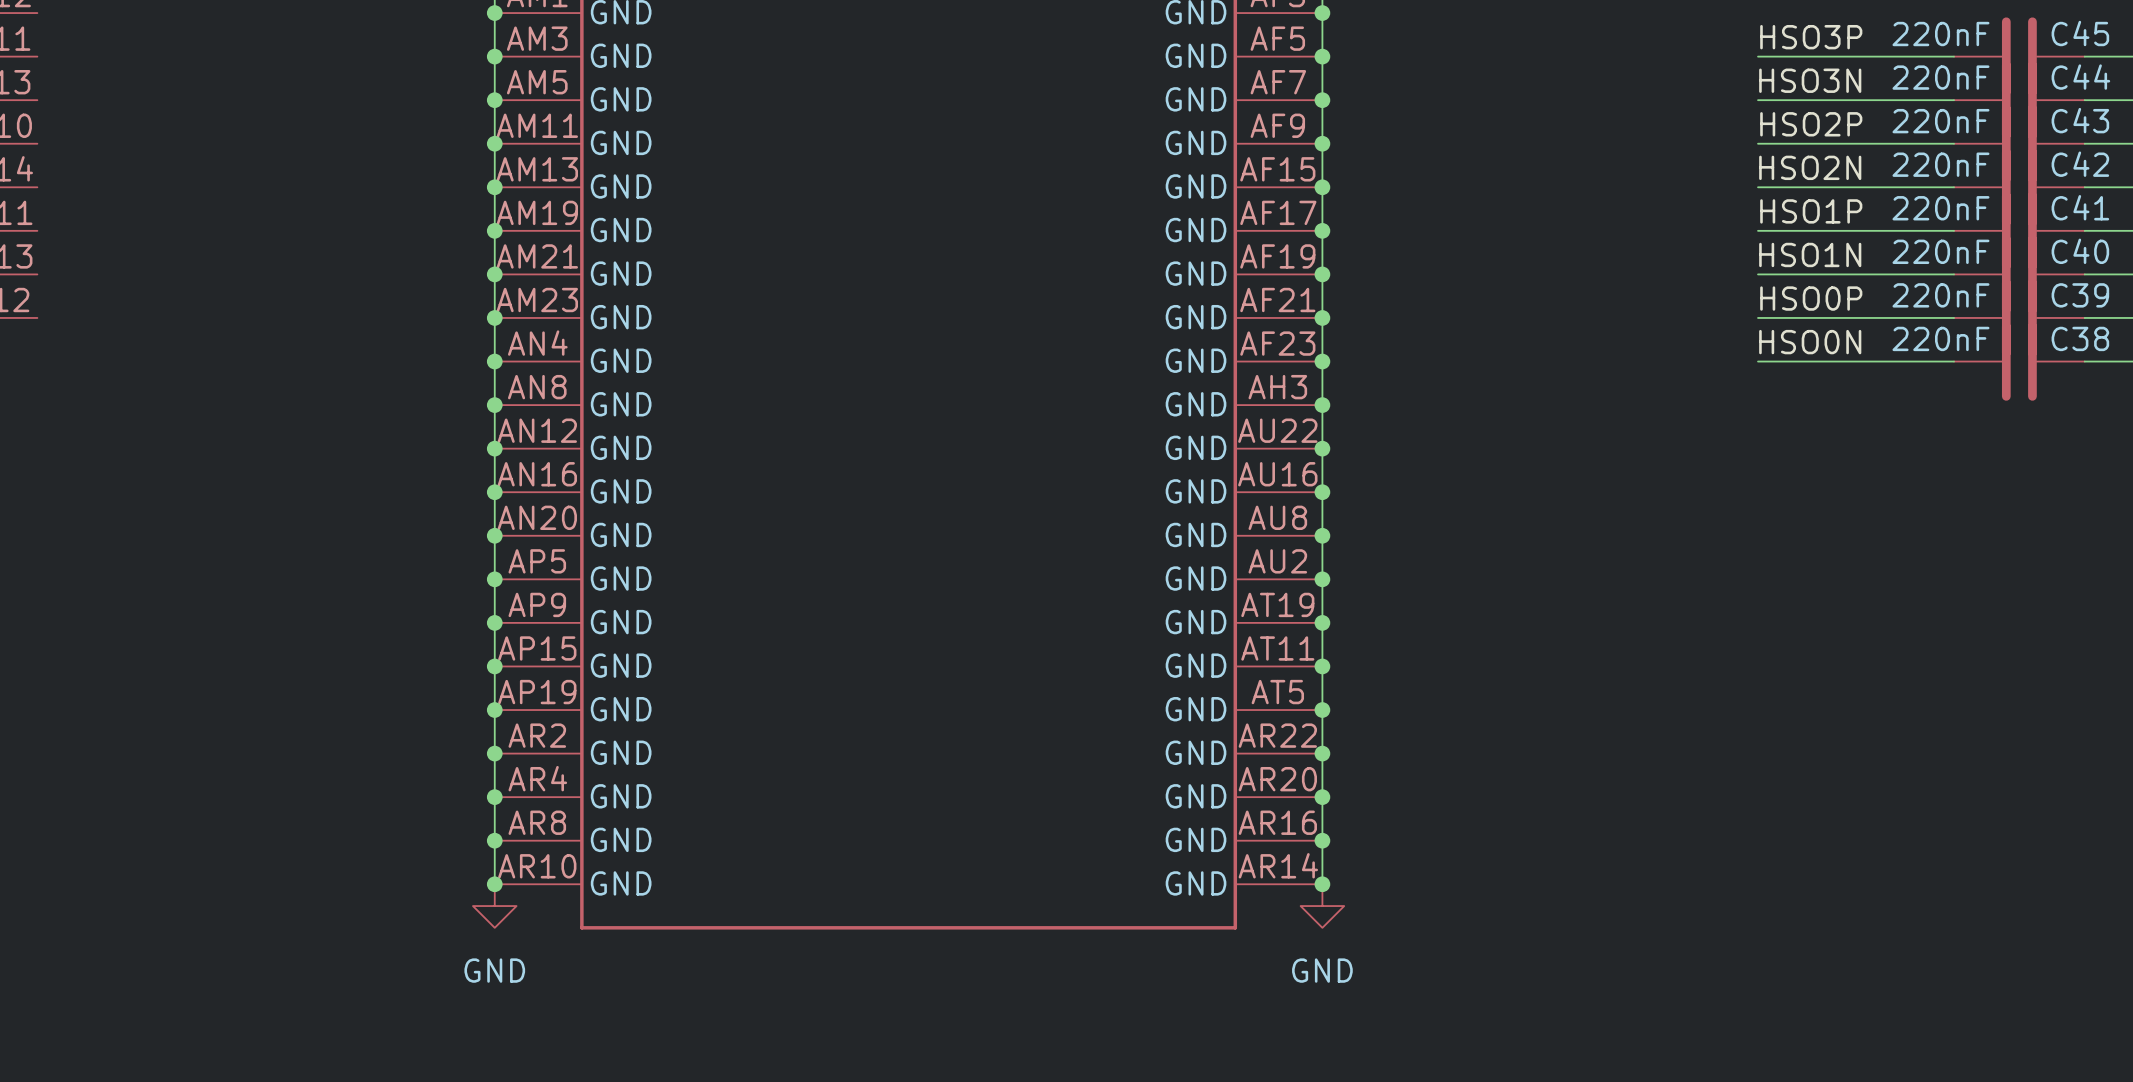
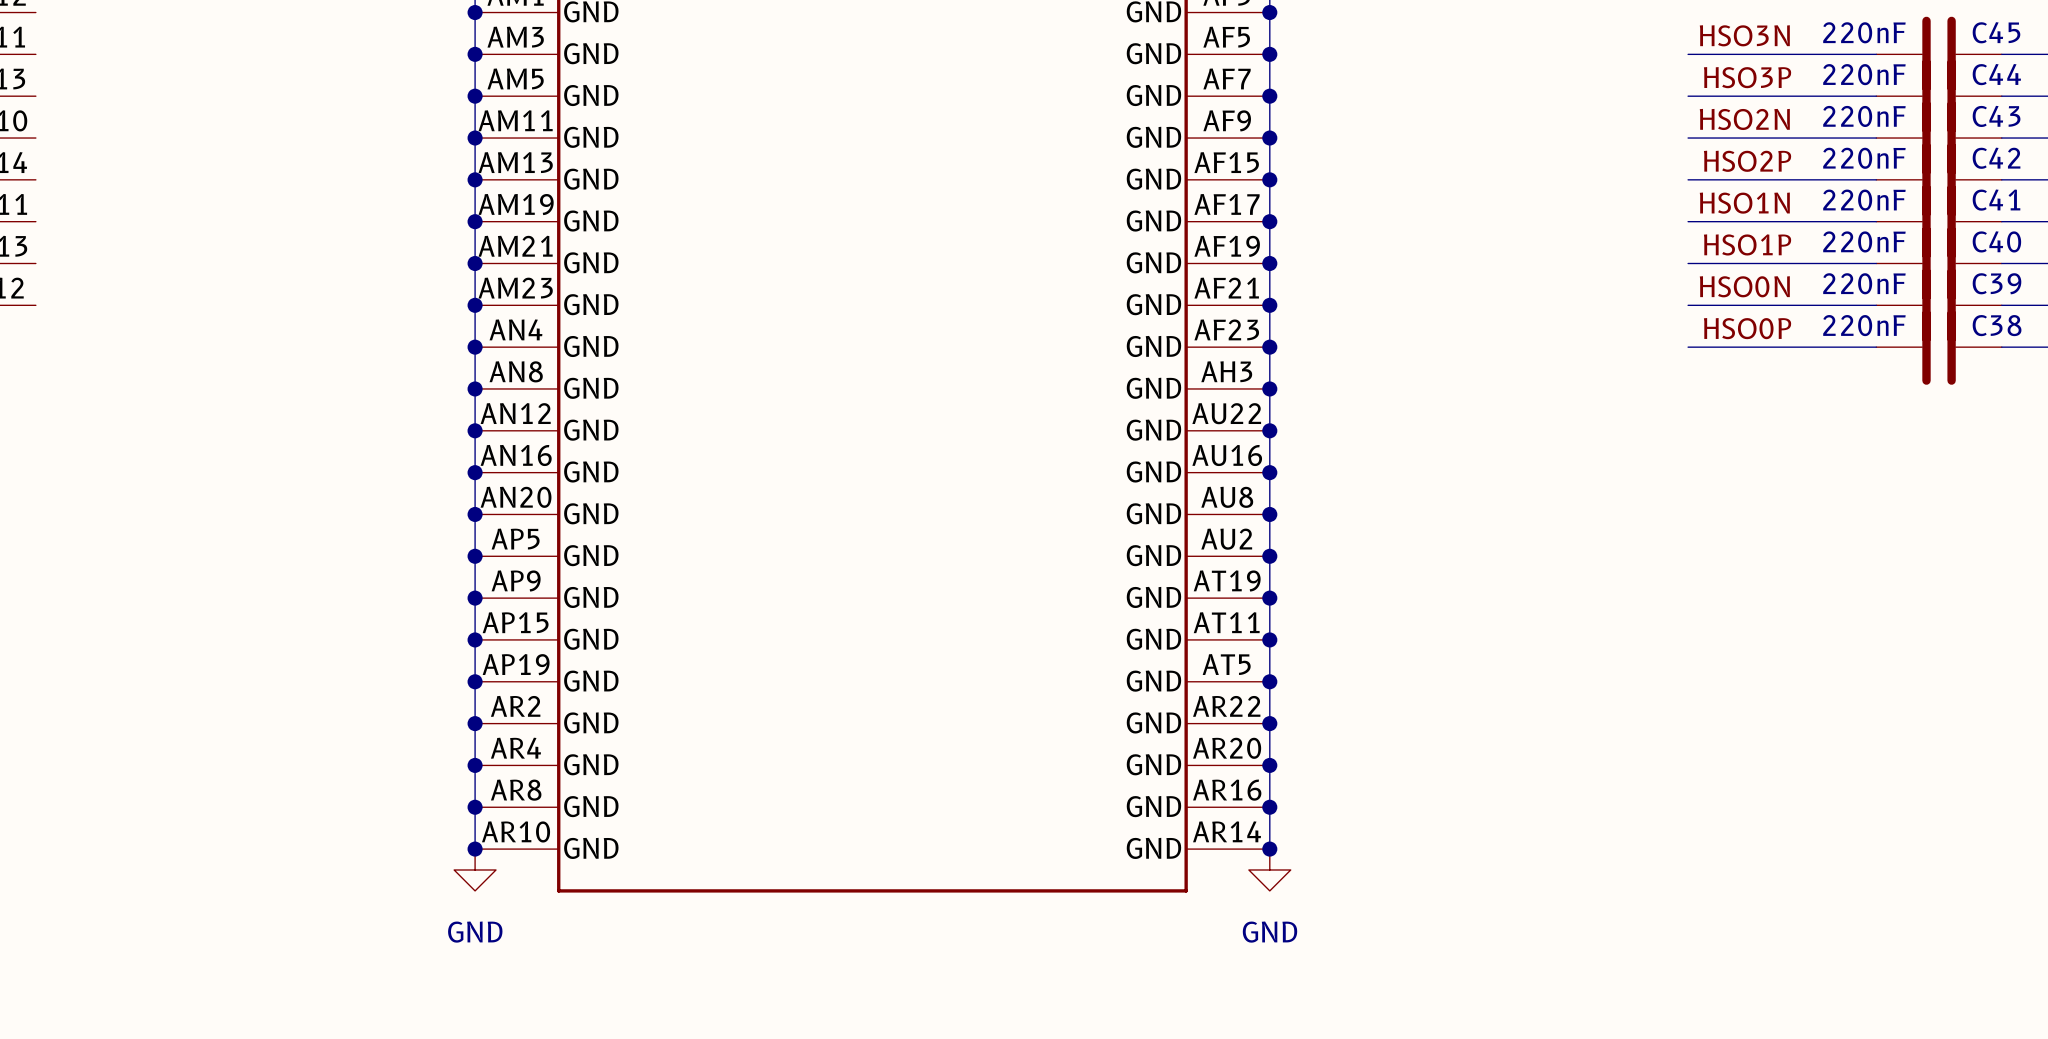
label: HSO3P (1811, 37) -> HSO3N (1744, 35)
label: HSO3N (1810, 80) -> HSO3P (1747, 77)
label: HSO2P (1811, 124) -> HSO2N (1744, 119)
label: HSO2N (1810, 167) -> HSO2P (1747, 161)
label: HSO1P (1811, 211) -> HSO1N (1744, 203)
label: HSO1N (1810, 254) -> HSO1P (1747, 244)
label: HSO0P (1811, 298) -> HSO0N (1744, 286)
label: HSO0N (1810, 342) -> HSO0P (1747, 328)

